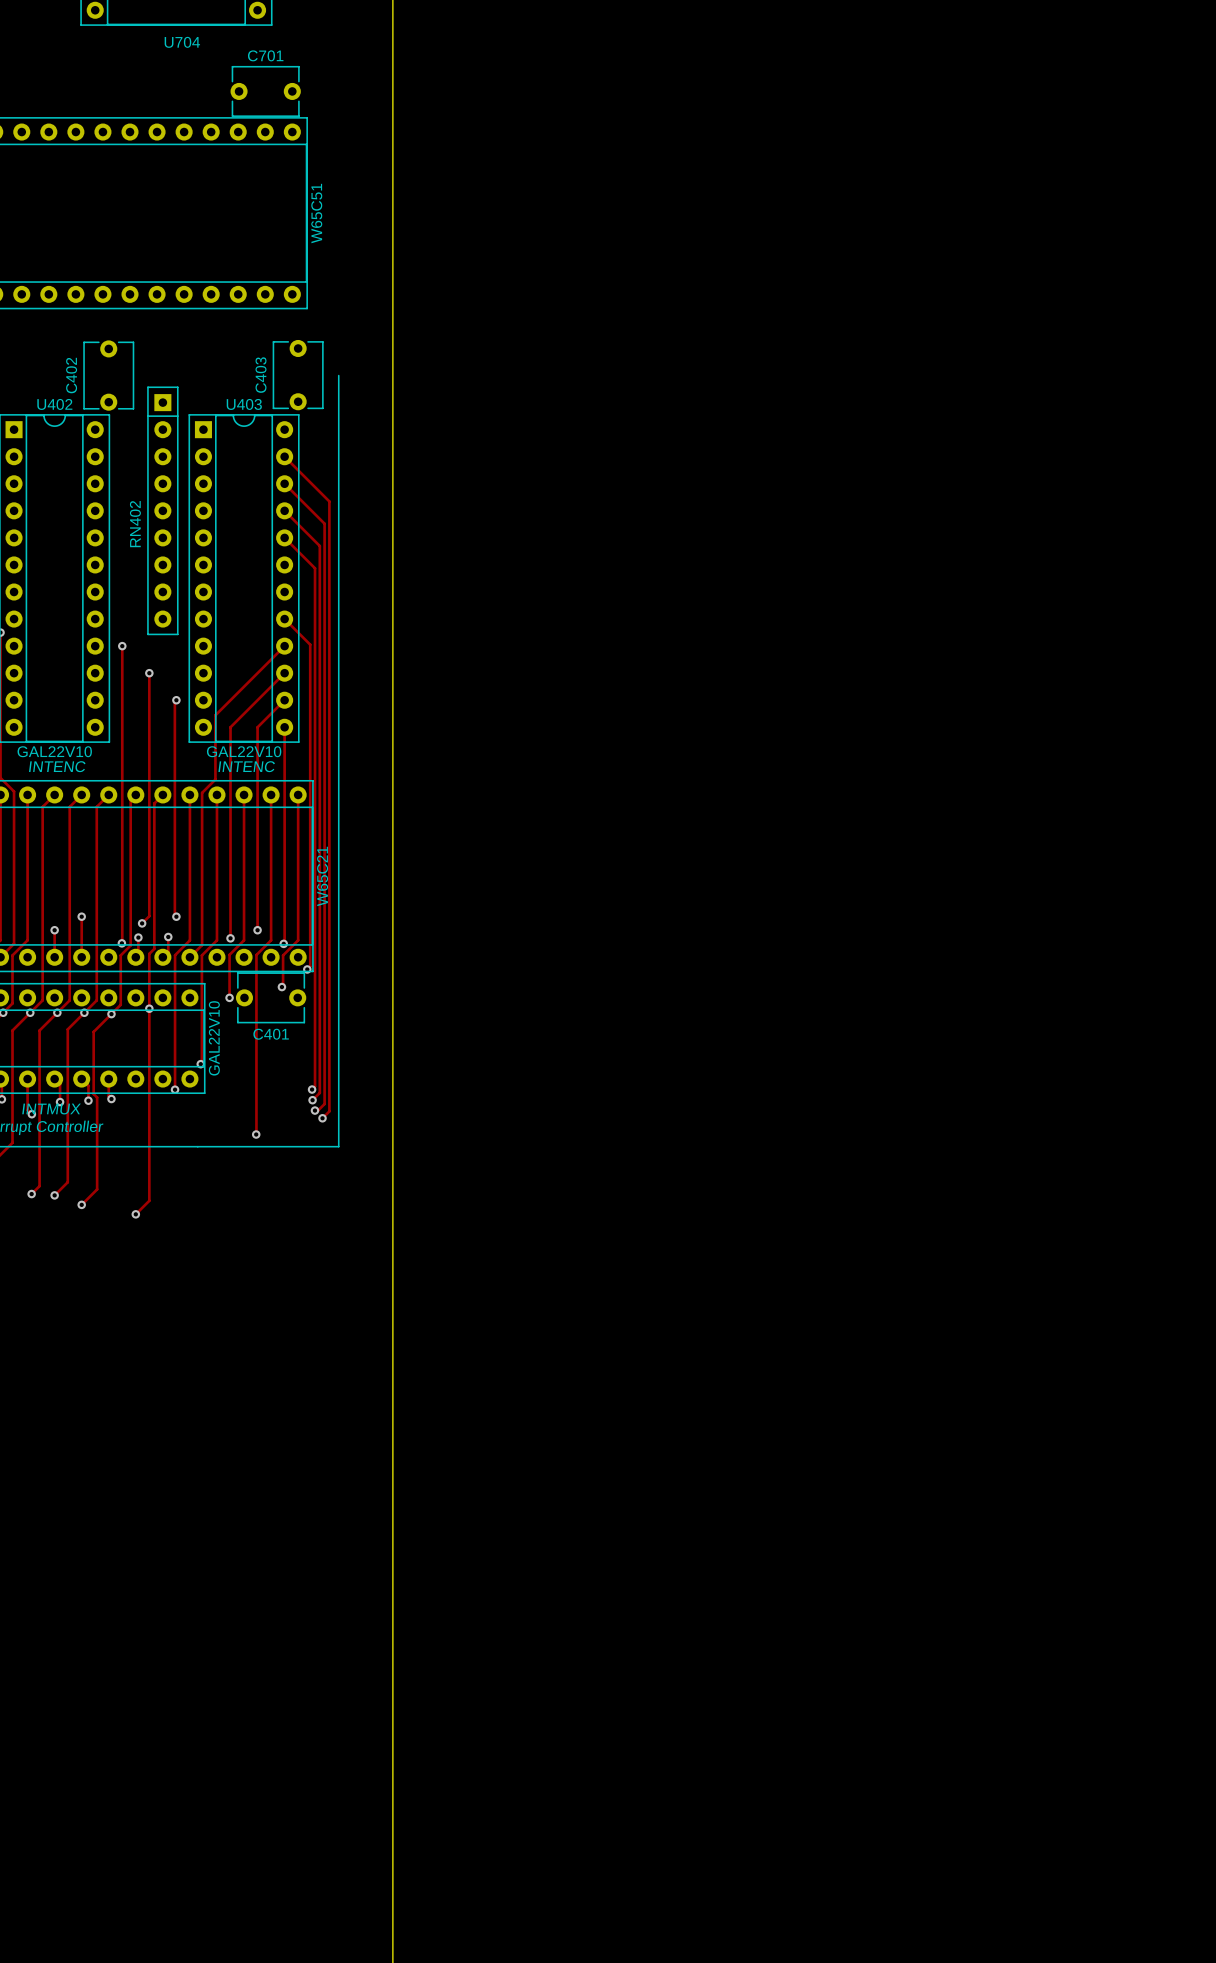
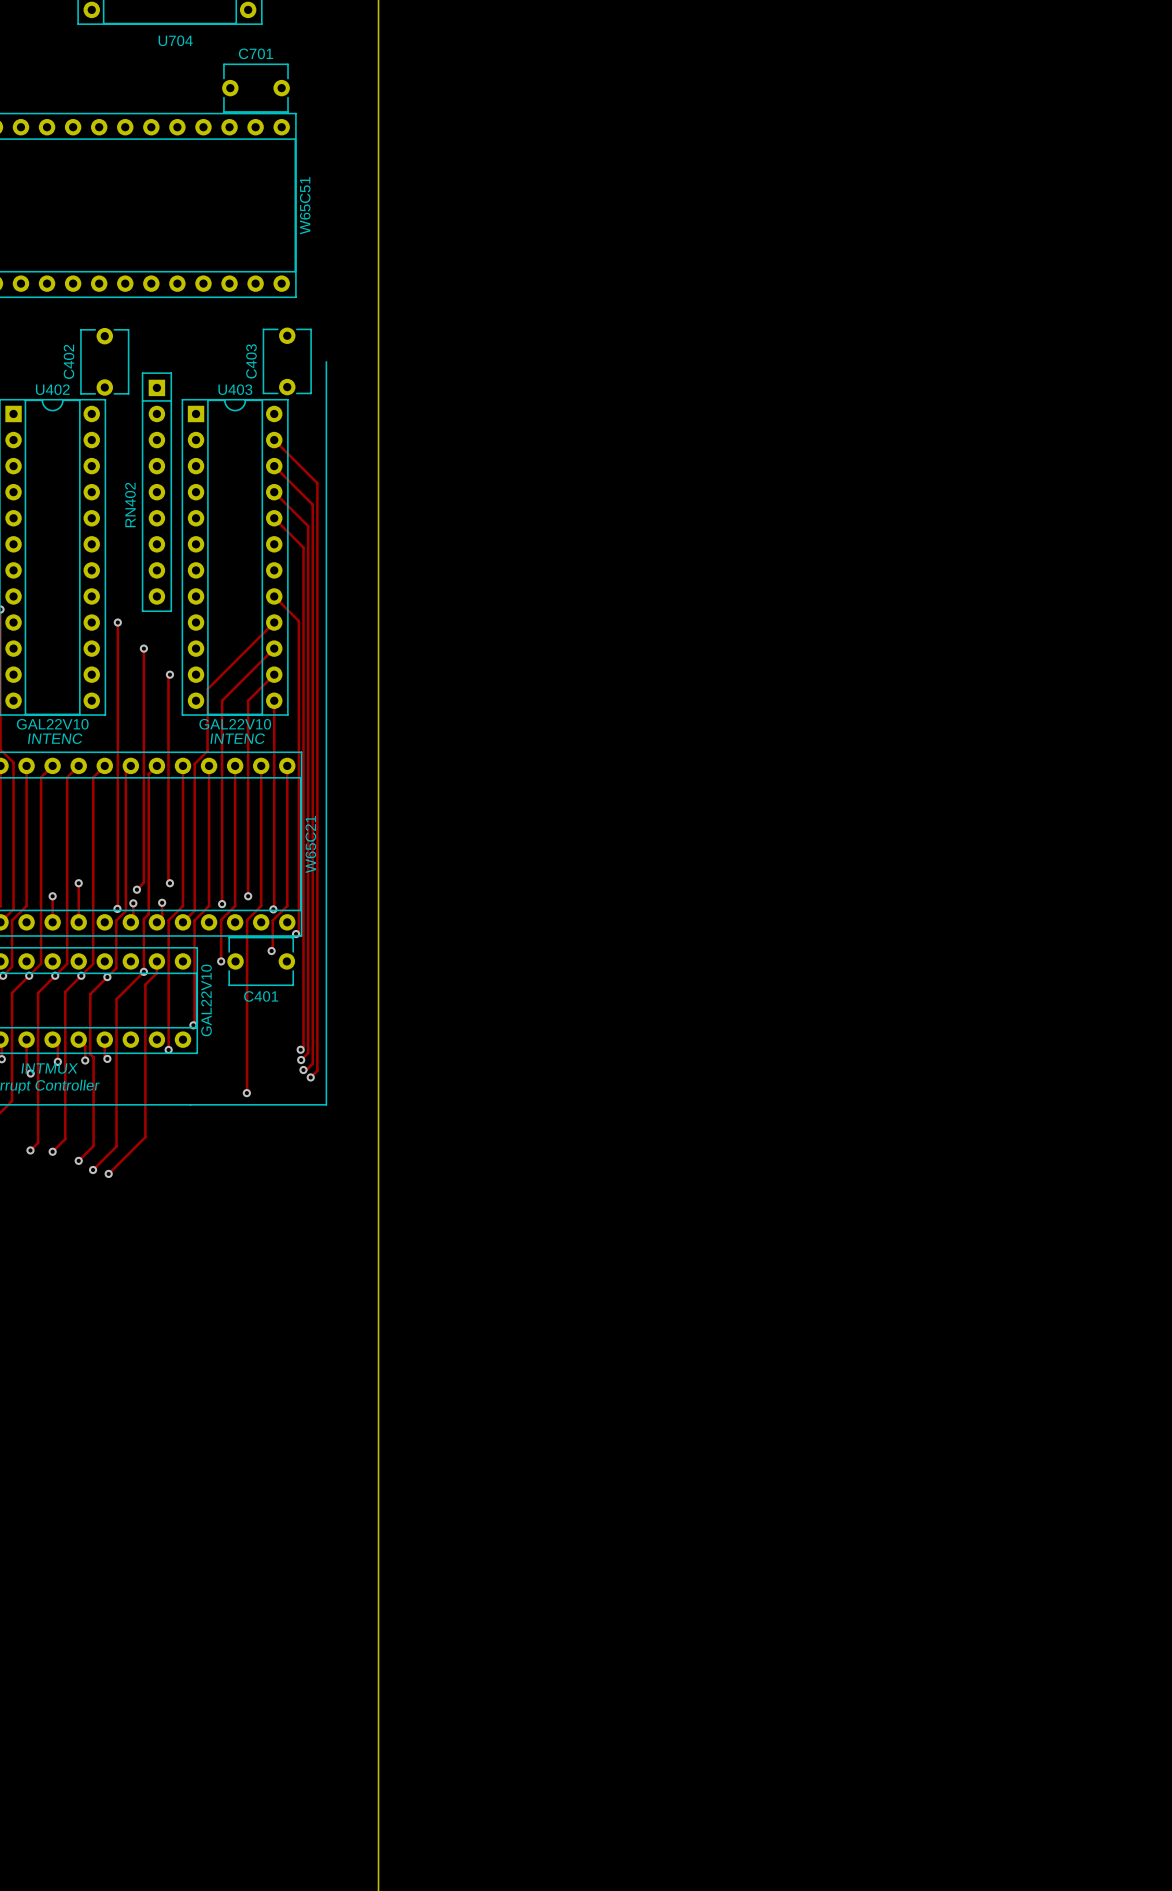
track: none -> (156, 961) (156, 973) (145, 984) (145, 1137) (108, 1173)
track: (149, 1008) (149, 1200) (135, 1214) -> (143, 971) (116, 999) (116, 1146) (93, 1169)
via: none -> (93, 1169)
via: (135, 1214) -> none
via: none -> (108, 1173)

